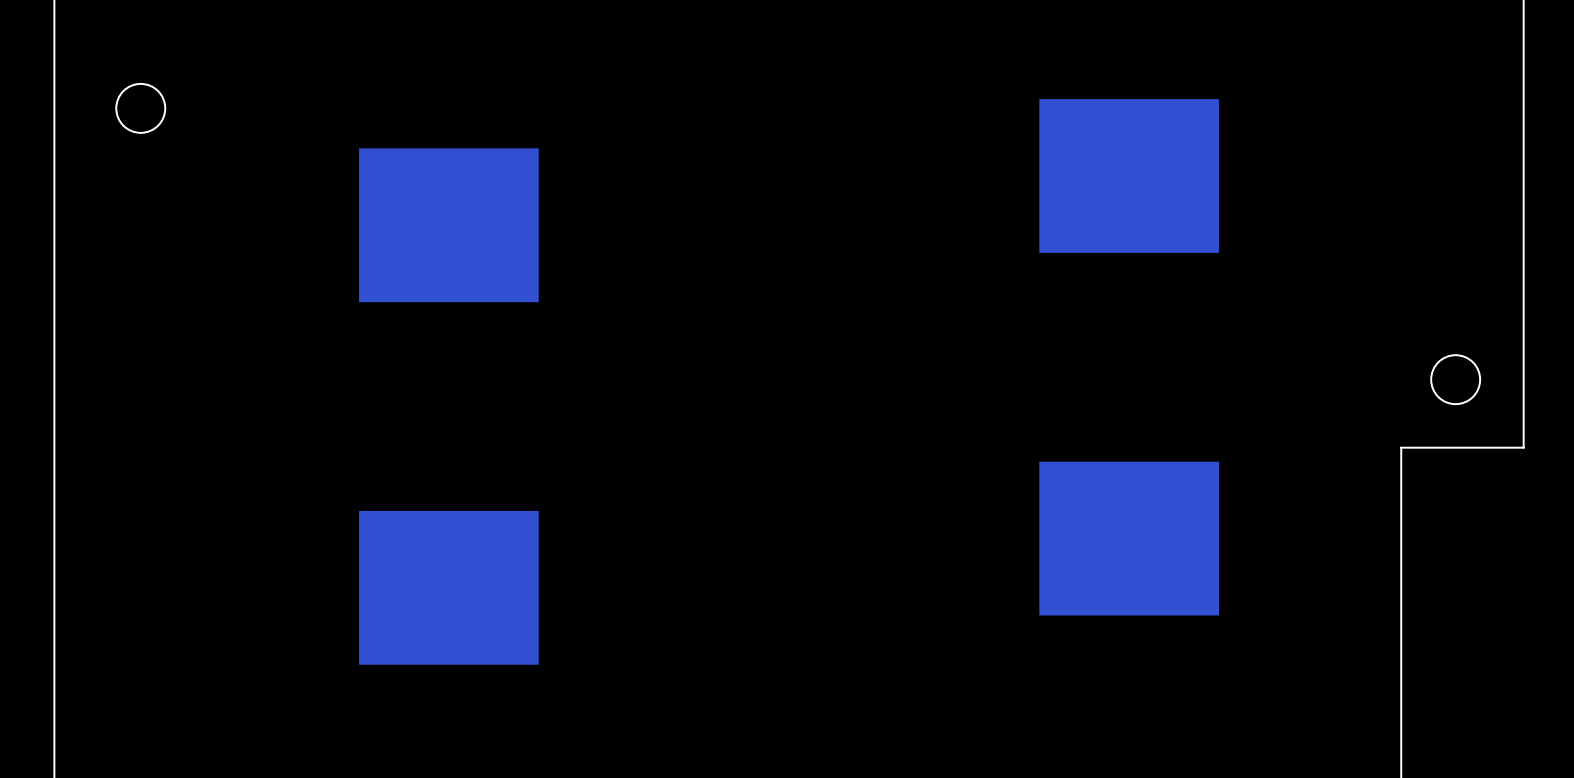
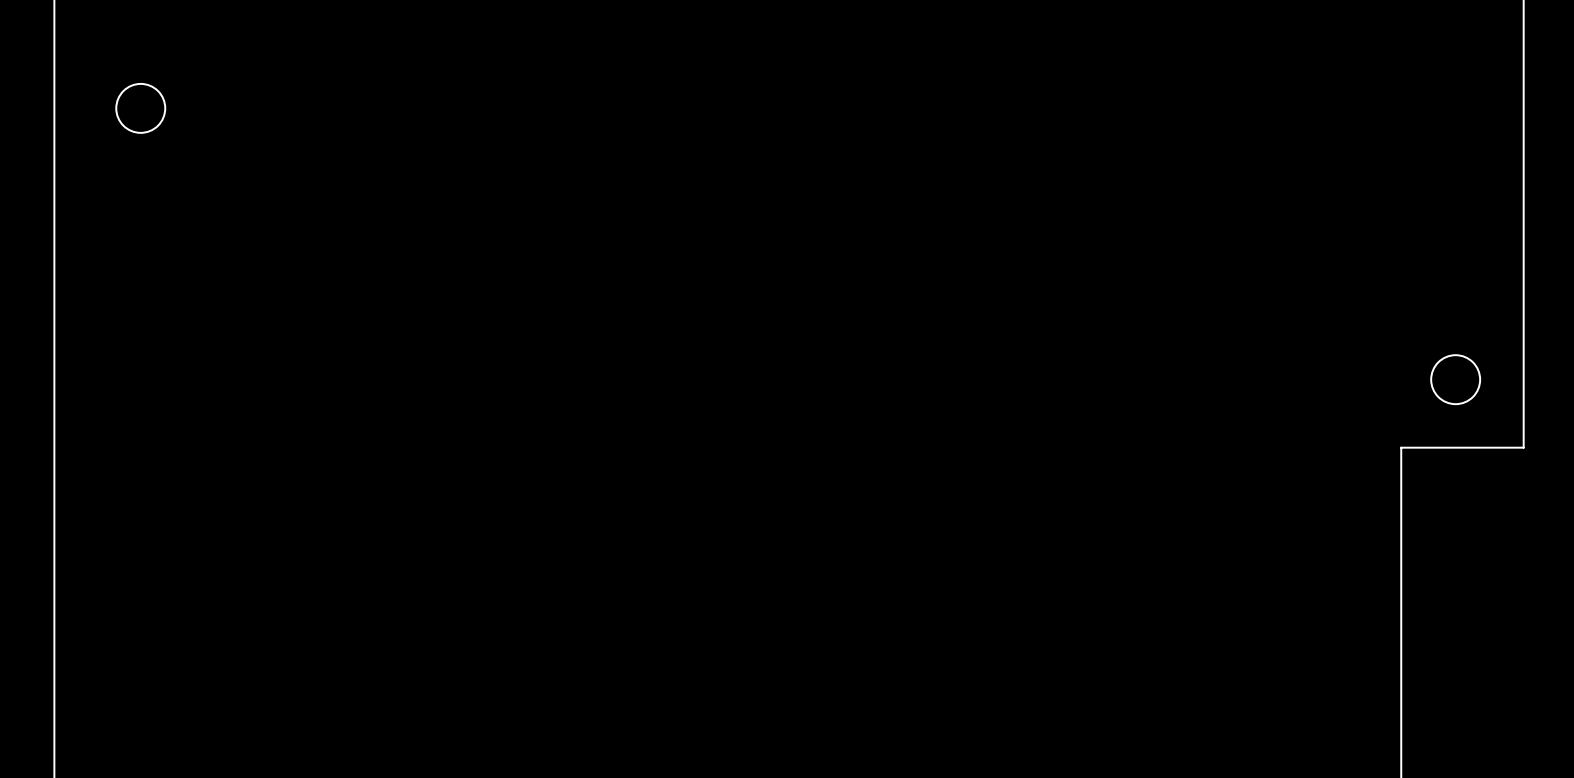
part: (1129, 176) -> none
part: (448, 225) -> none
part: (1129, 538) -> none
part: (448, 587) -> none

